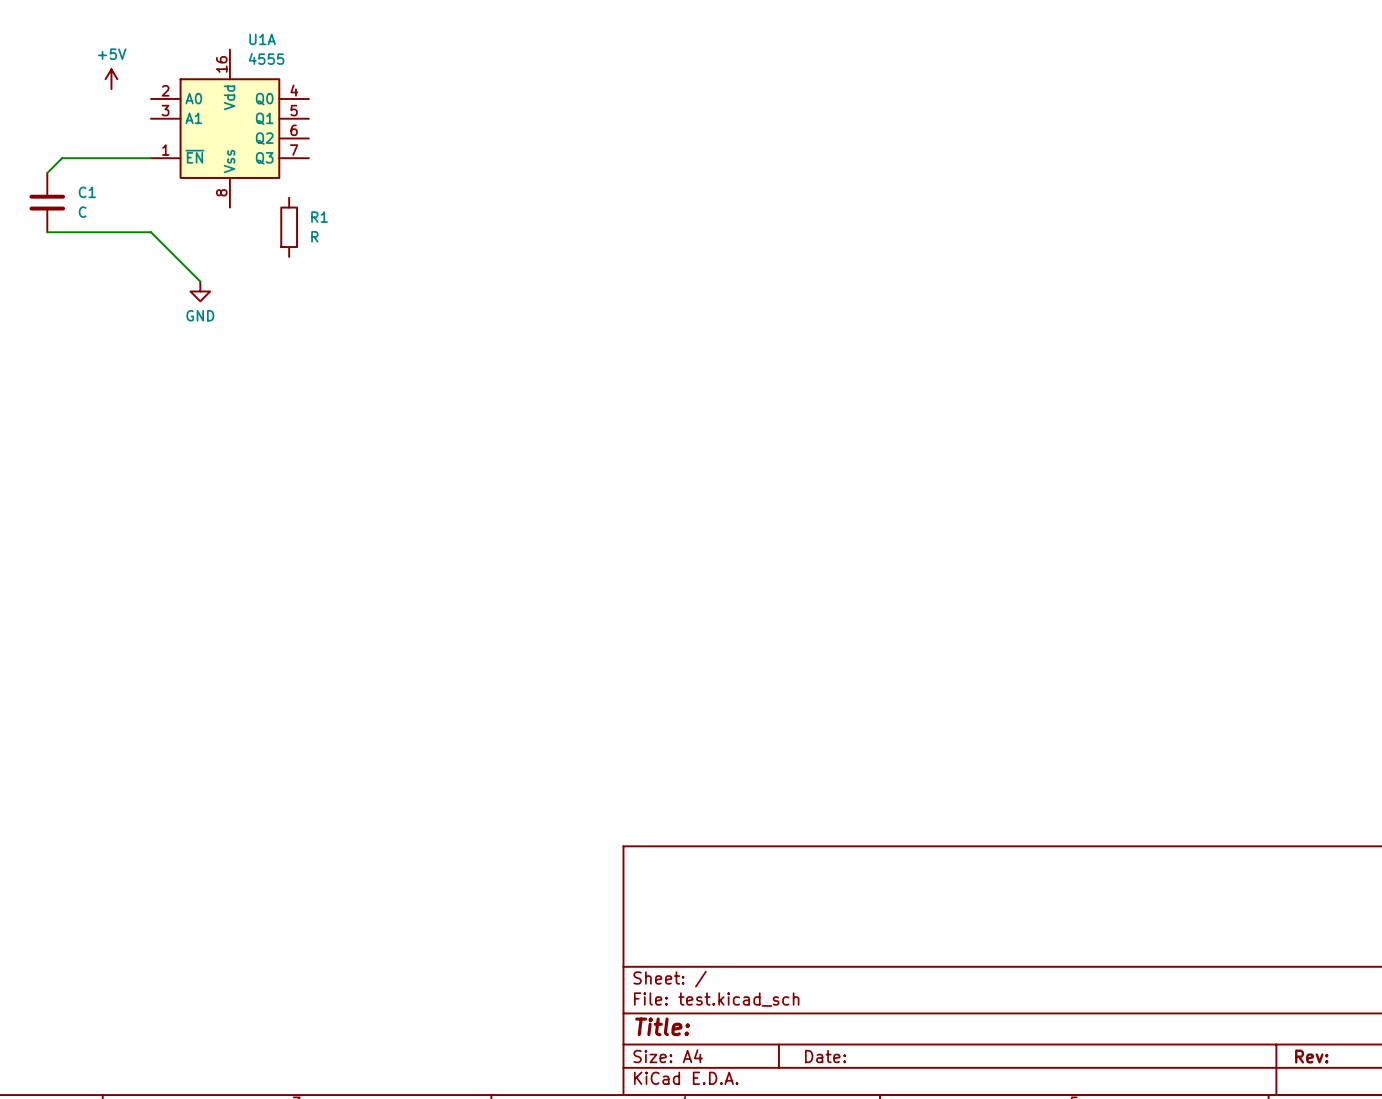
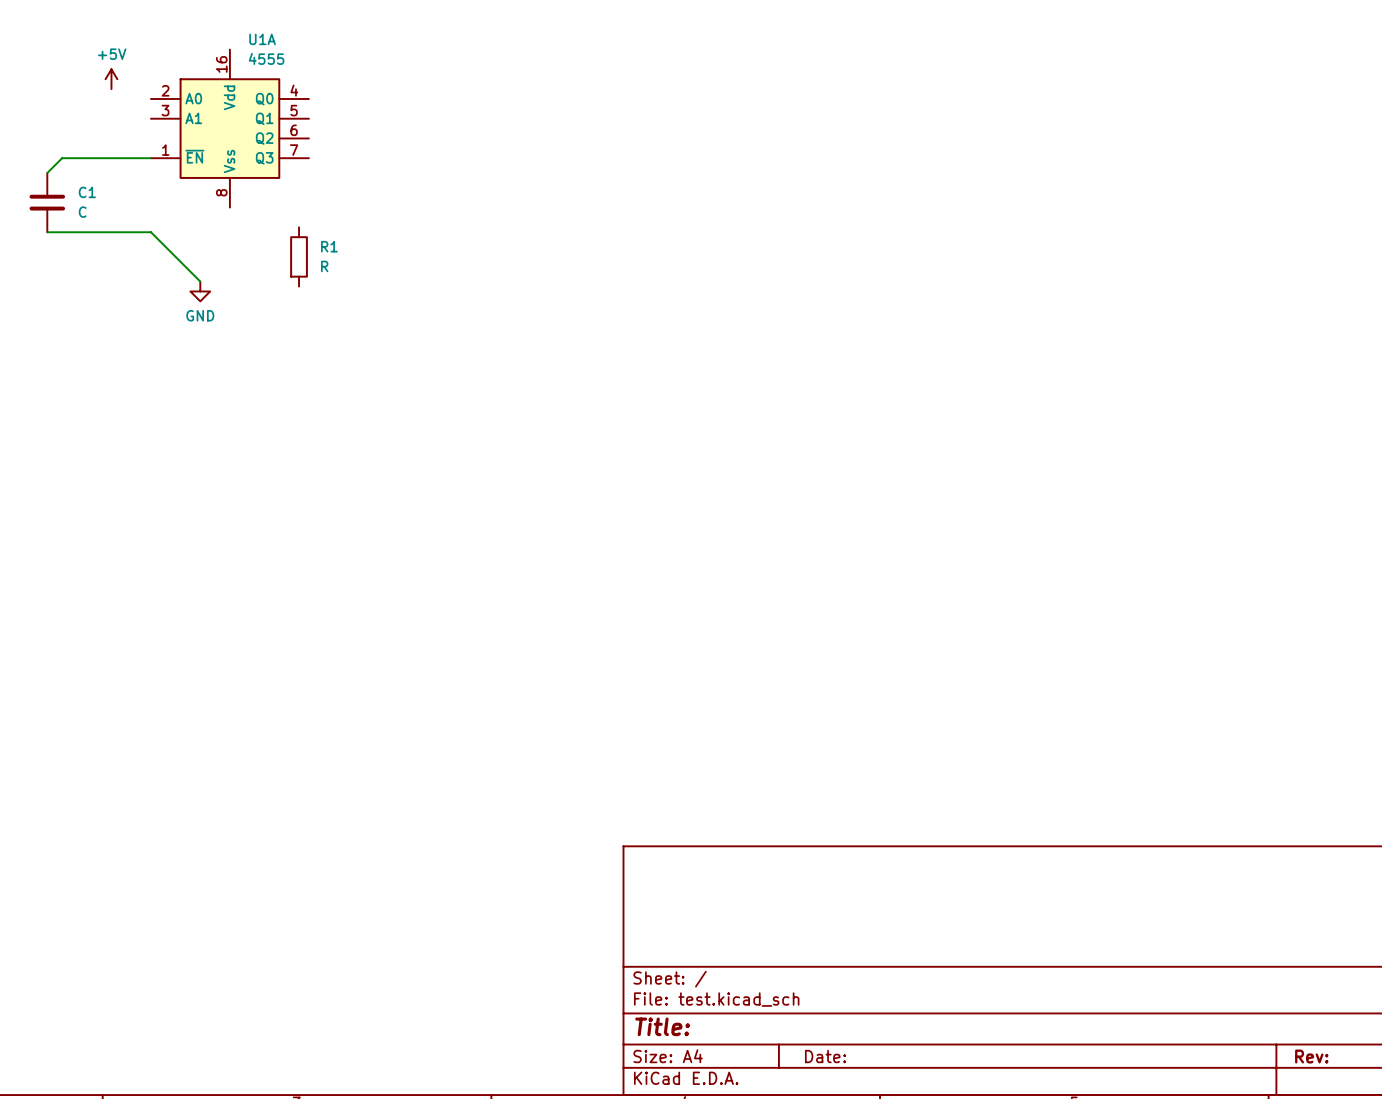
R1 position: (289, 227) -> (299, 256)

